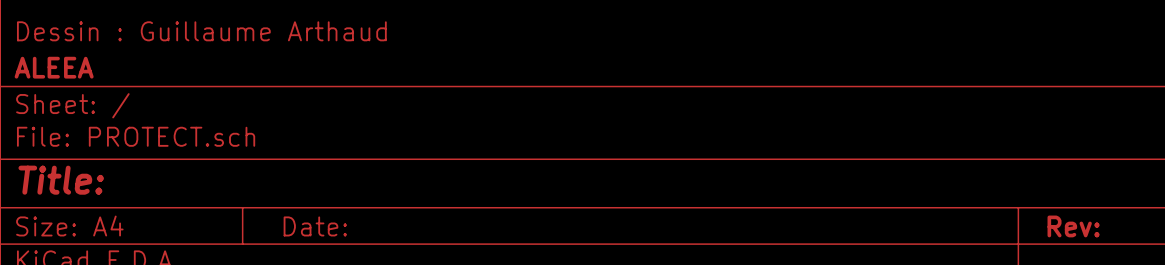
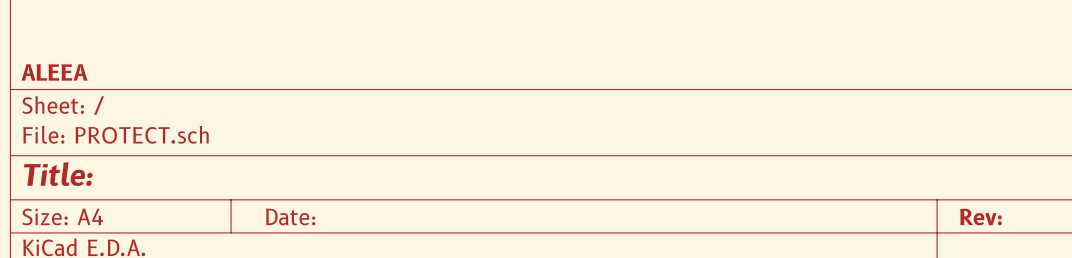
title block: Dessin : Guillaume Arthaud (201, 31) -> none

